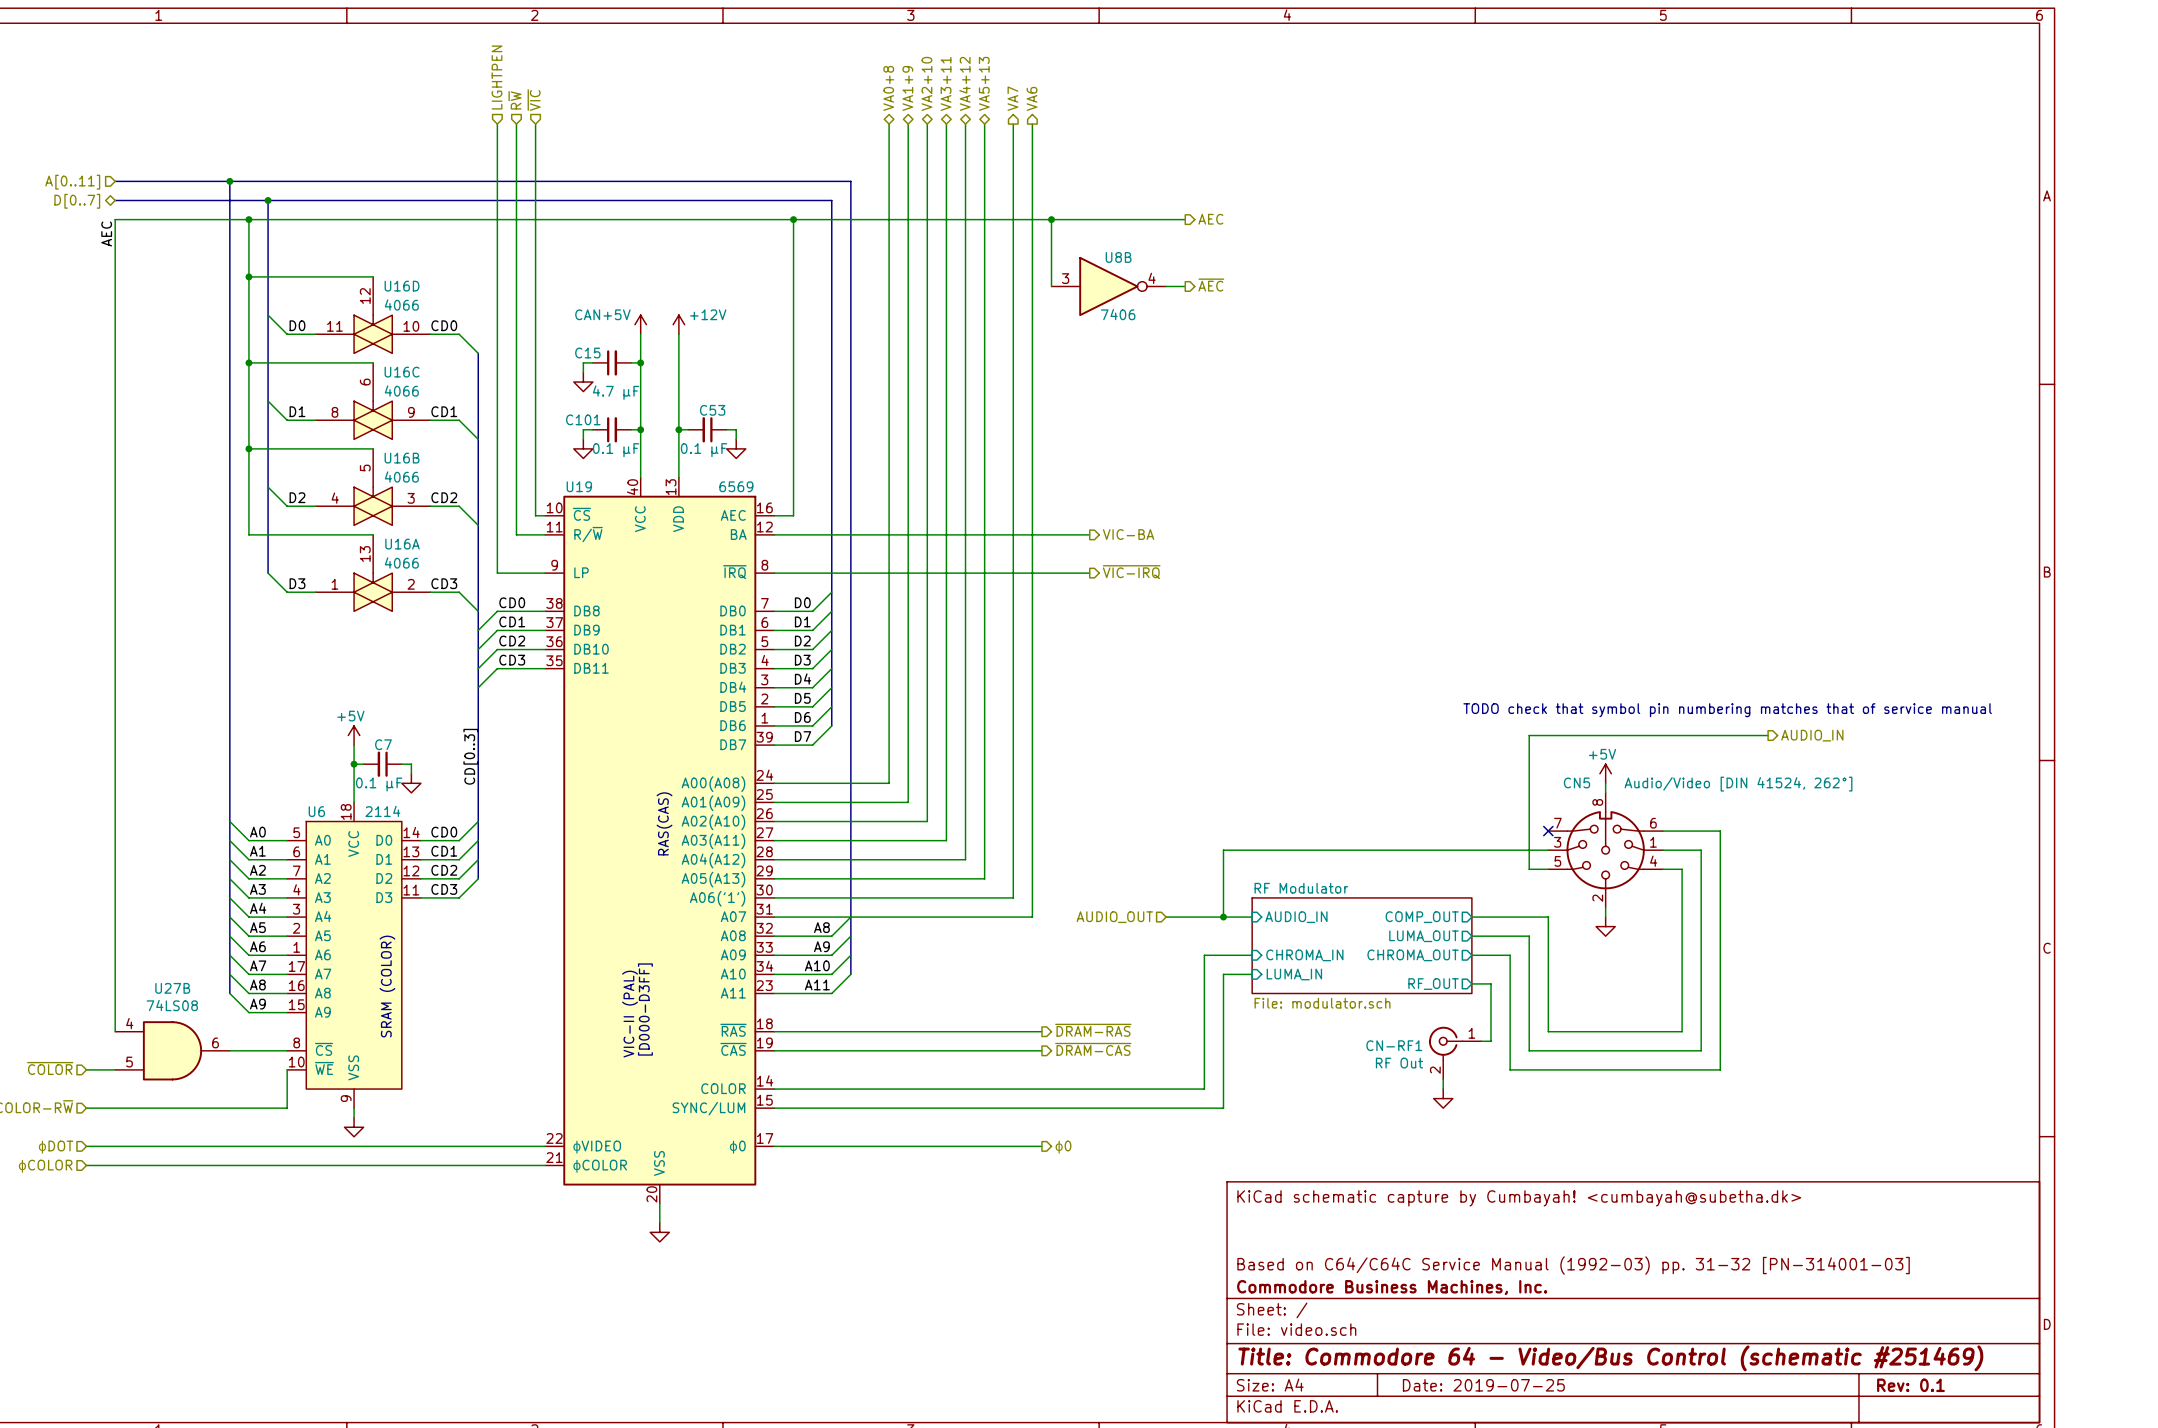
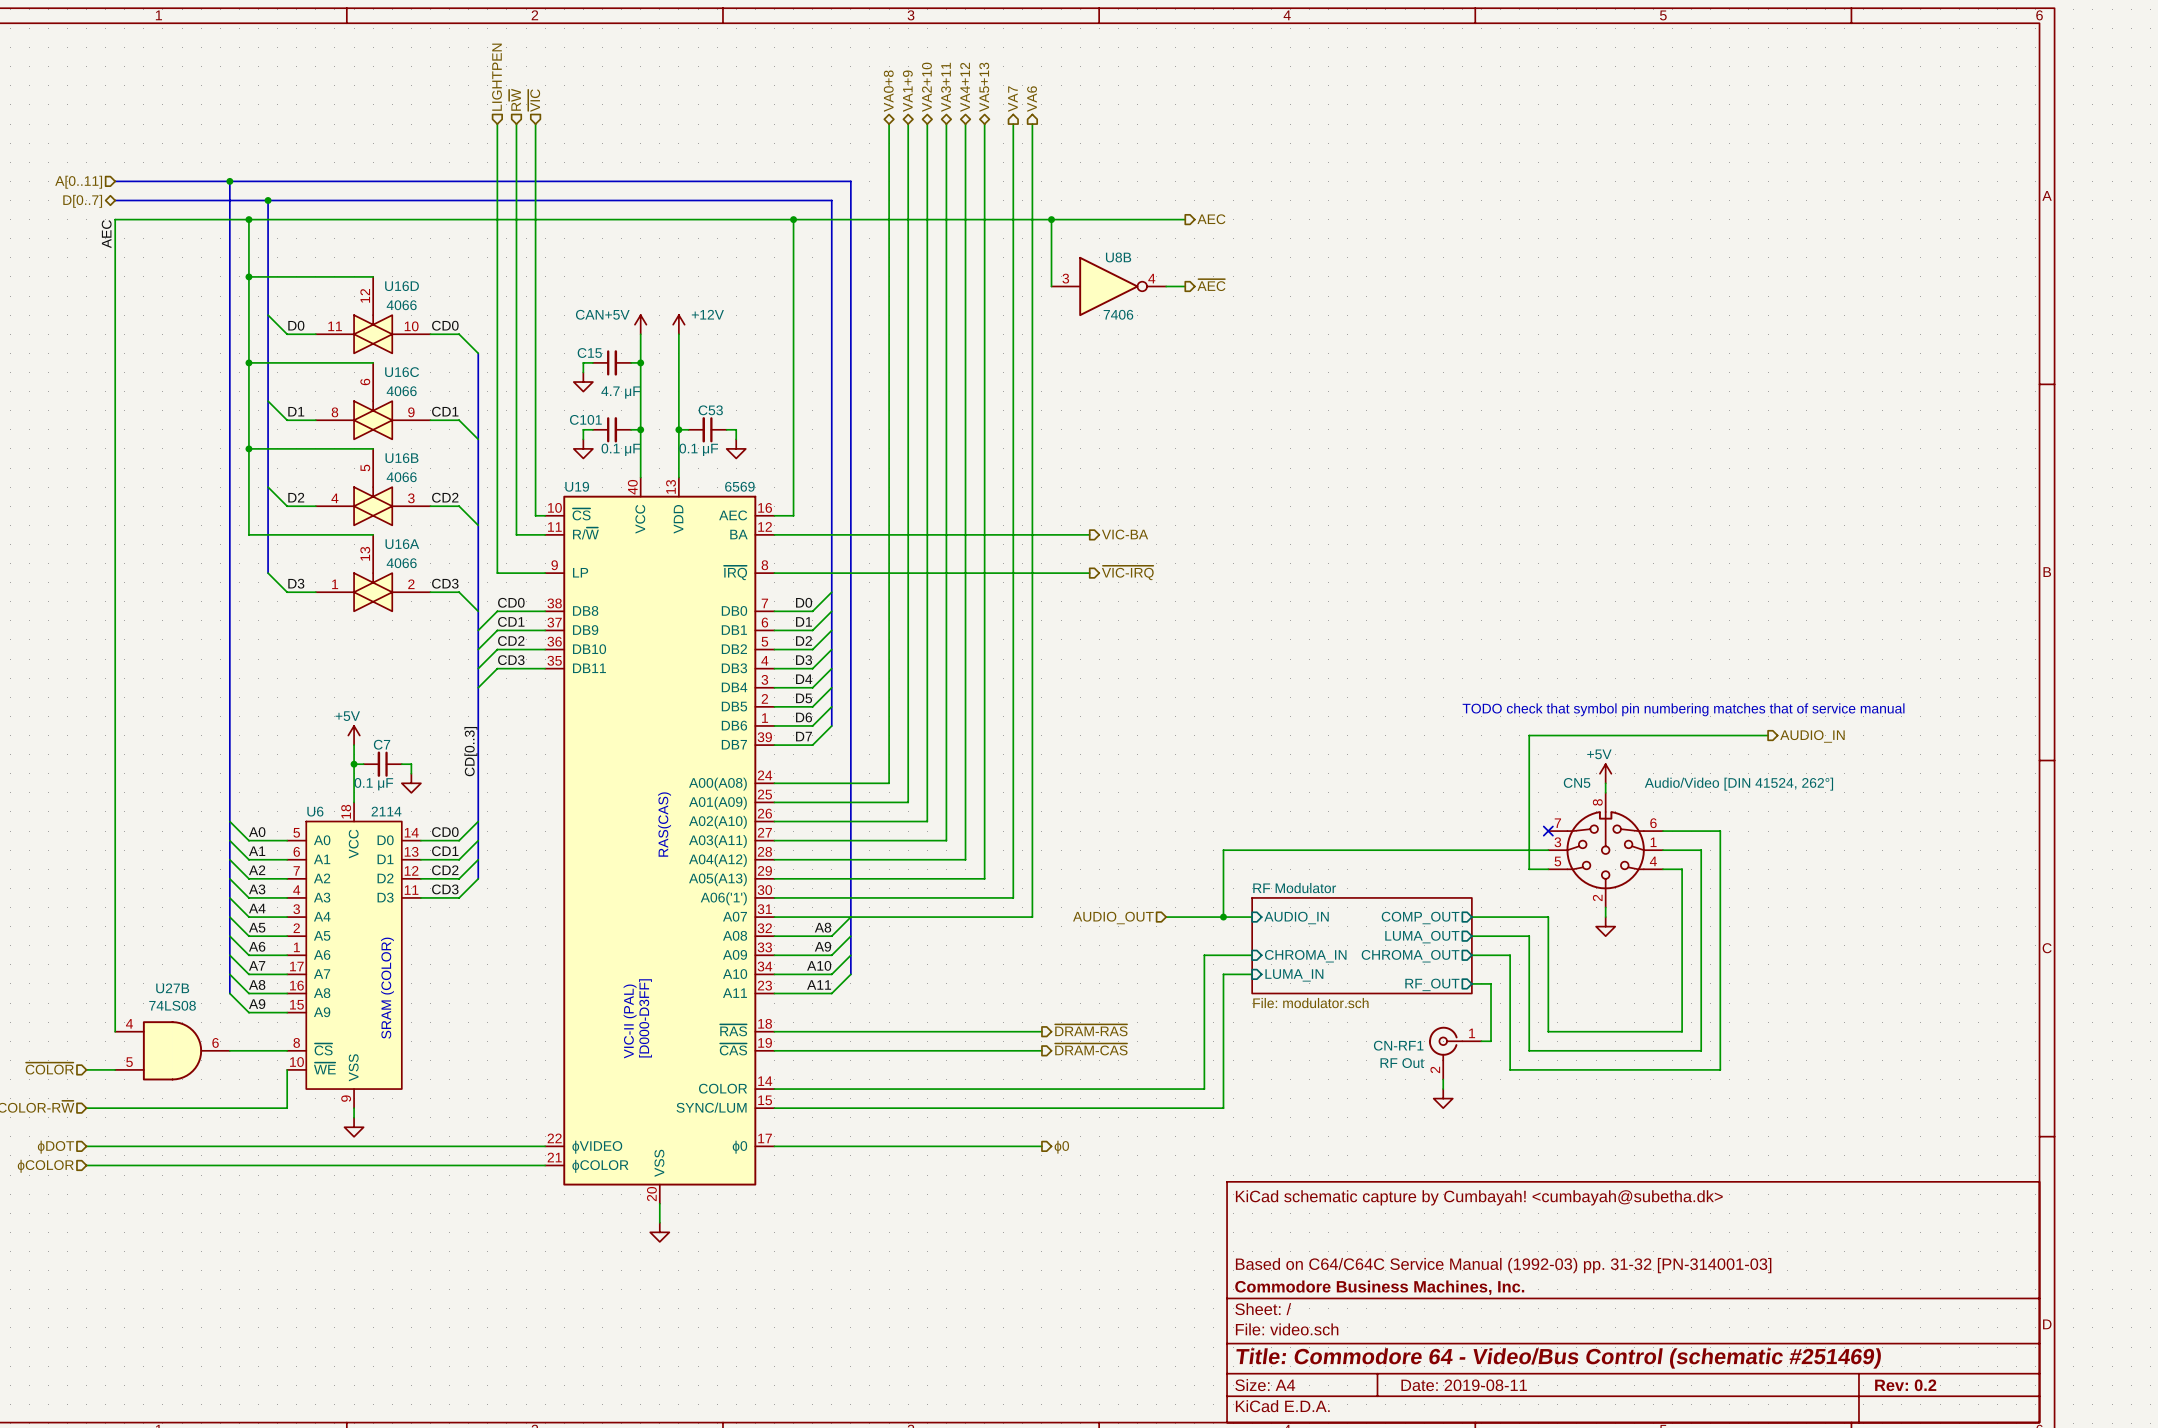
title block: Date: 2019-07-25 (1483, 1385) -> Date: 2019-08-11 (1464, 1385)
title block: Rev: 0.1 (1910, 1385) -> Rev: 0.2 (1905, 1385)

